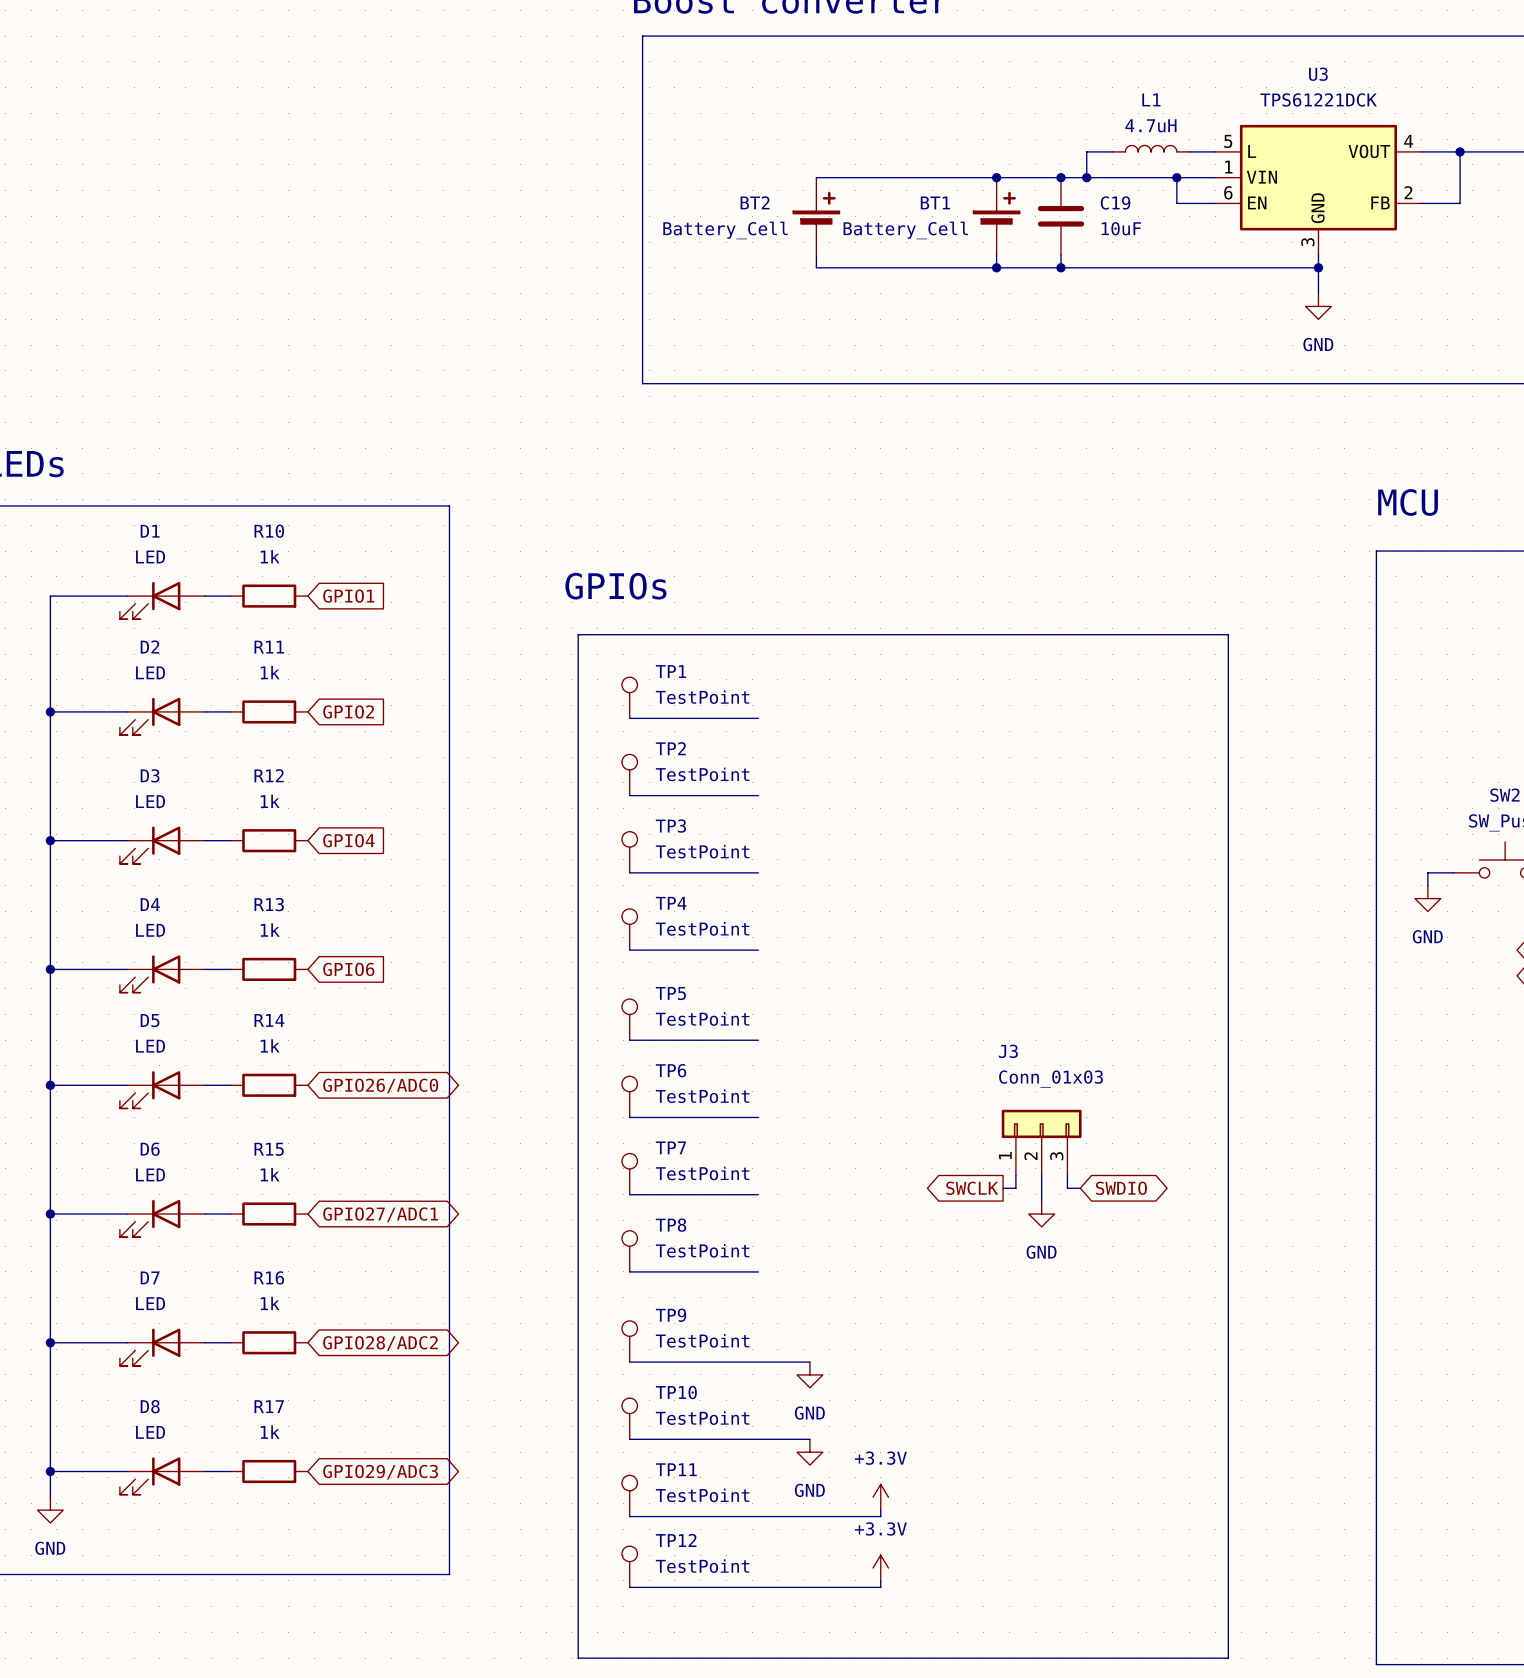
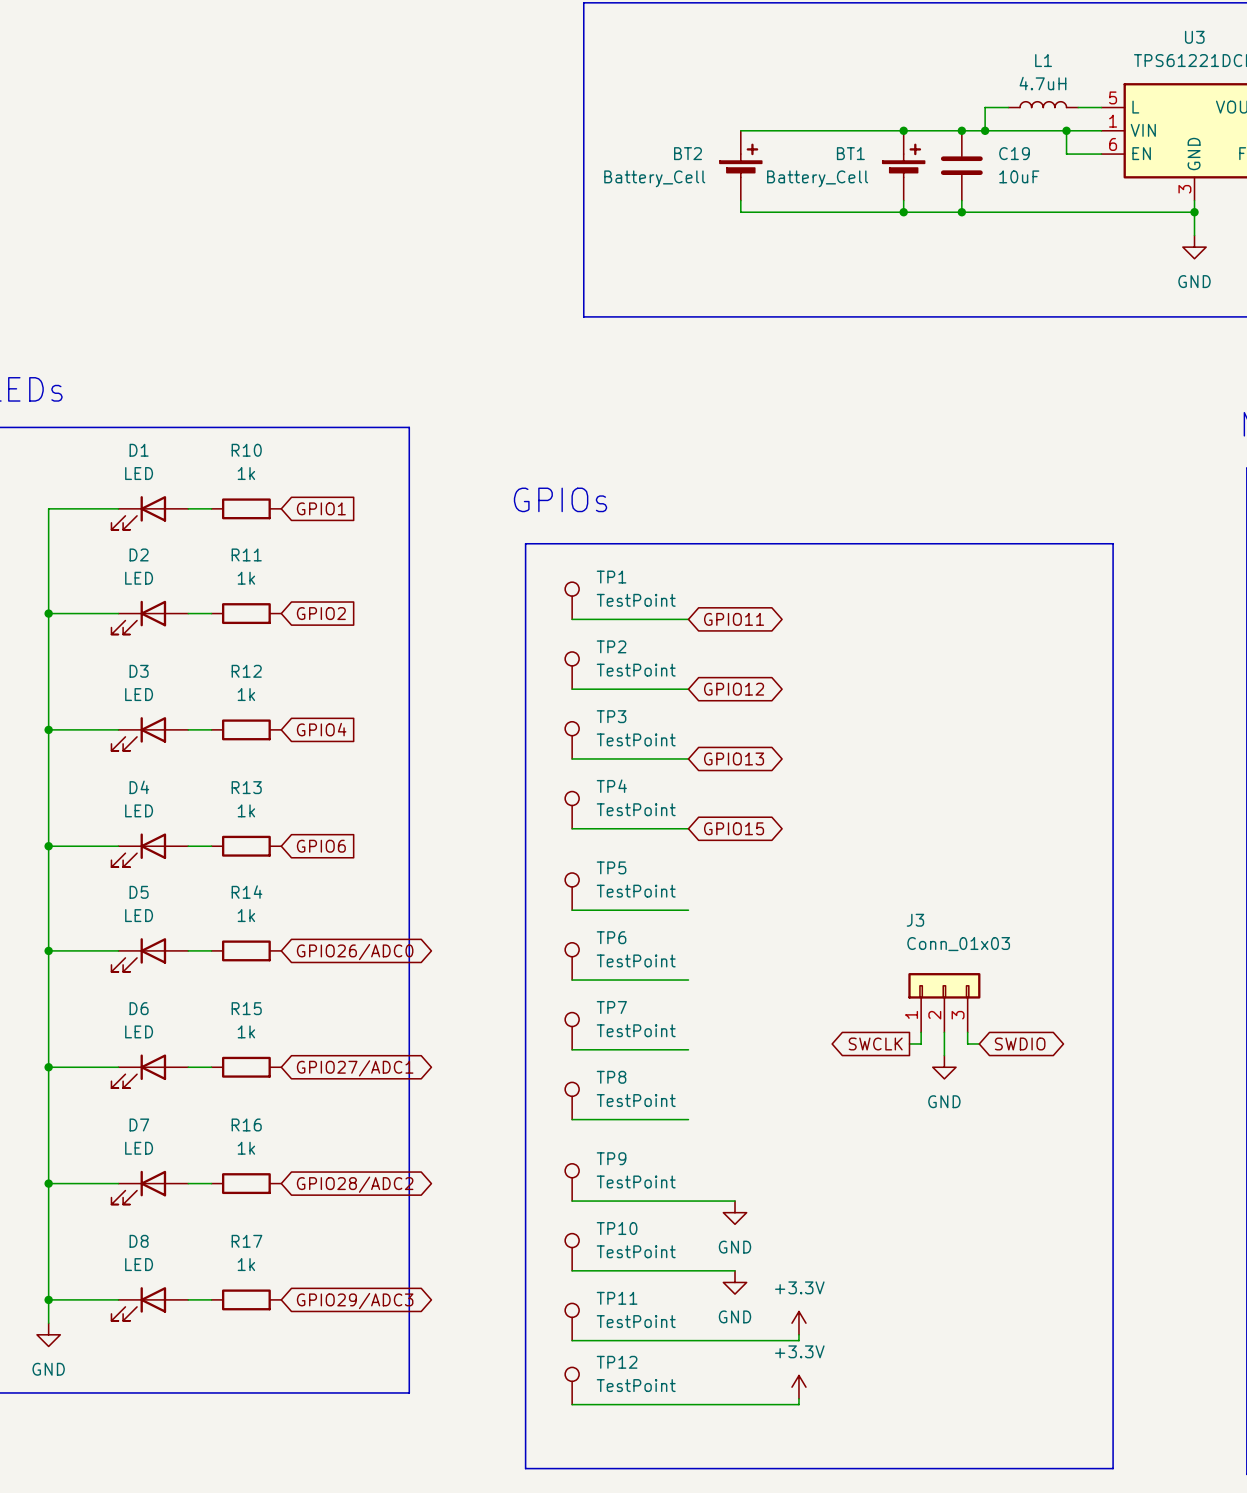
global label: none -> GPIO11 (734, 619)
global label: none -> GPIO12 (734, 689)
global label: none -> GPIO13 (734, 758)
global label: none -> GPIO15 (734, 828)

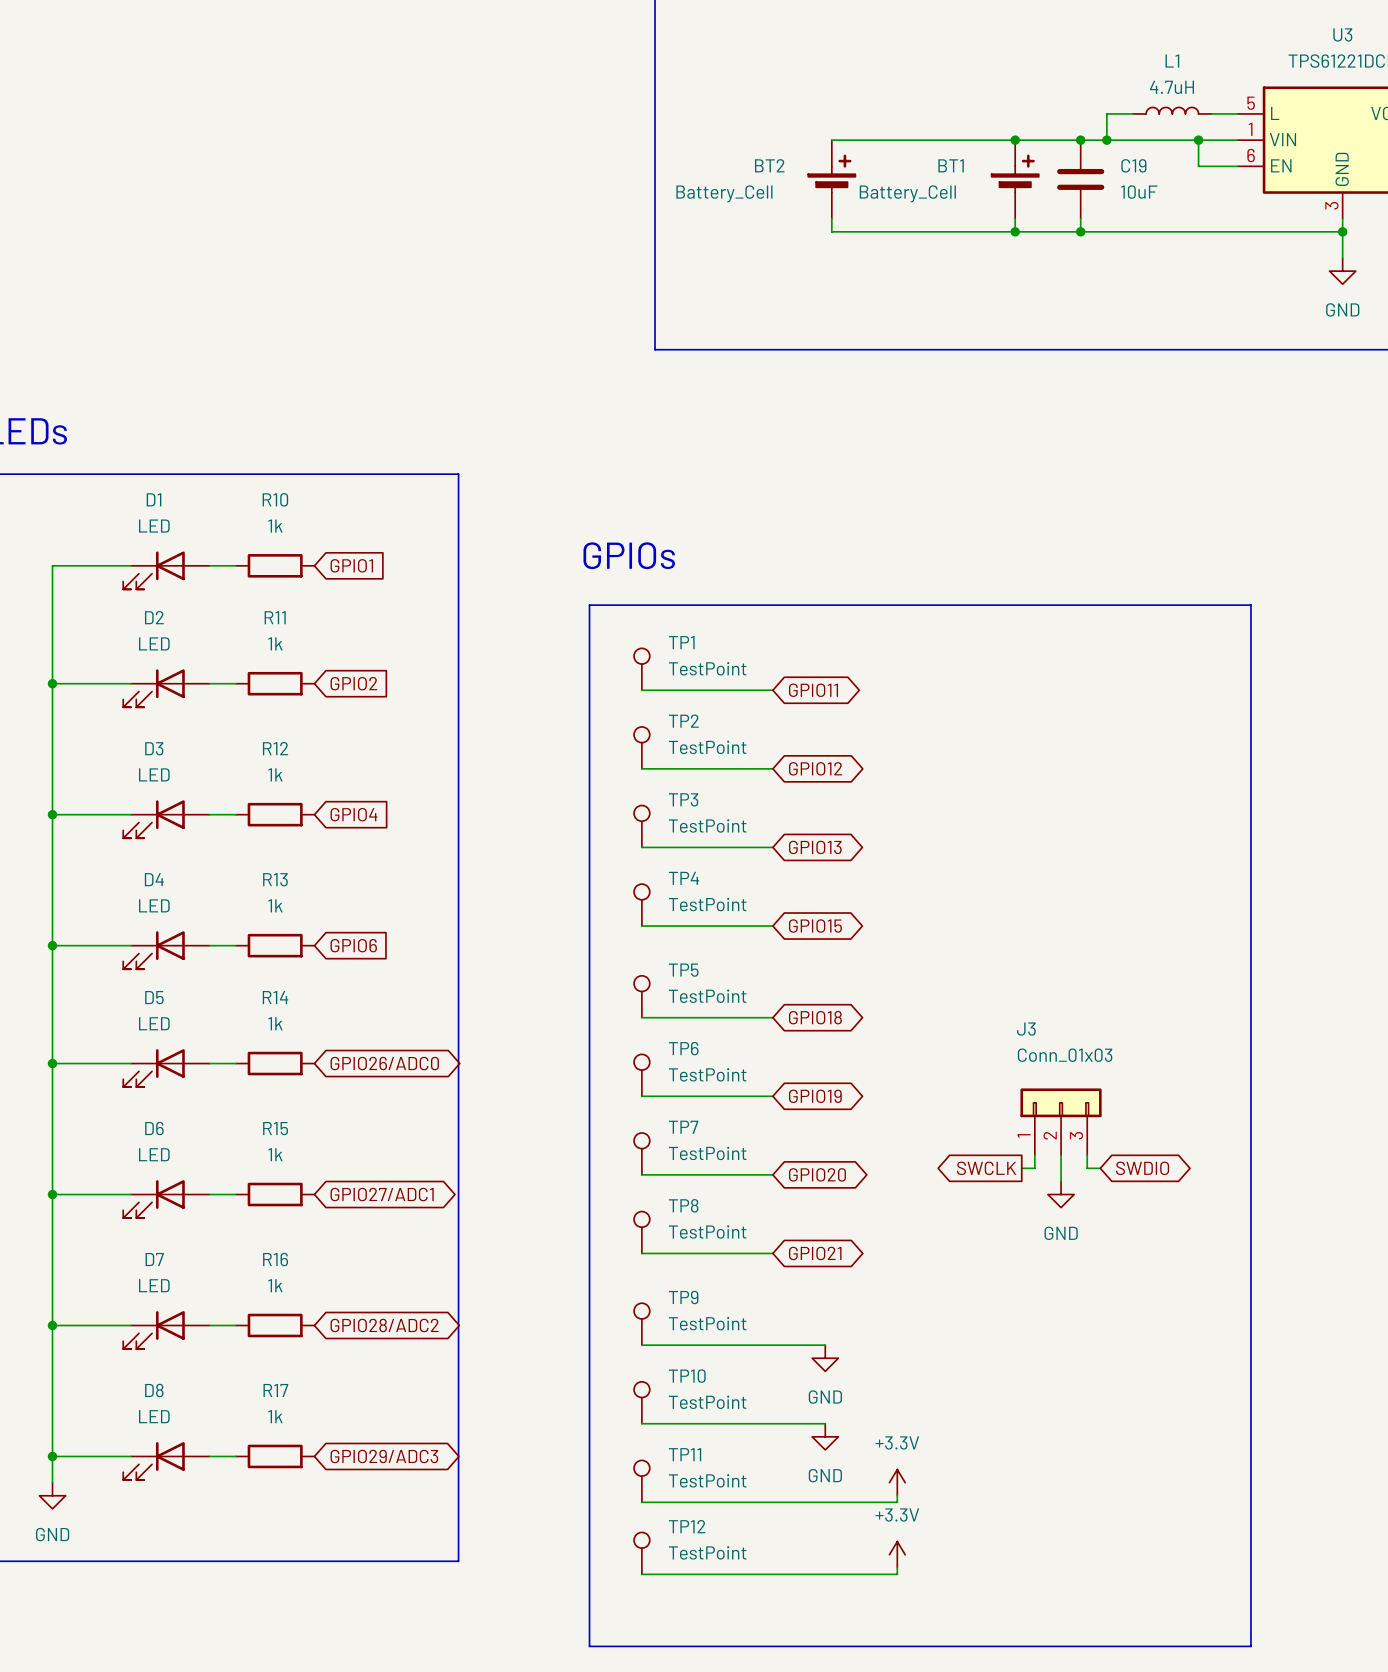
global label: none -> GPIO18 (815, 1017)
global label: none -> GPIO19 (815, 1096)
global label: none -> GPIO20 (817, 1174)
global label: none -> GPIO21 (815, 1253)

